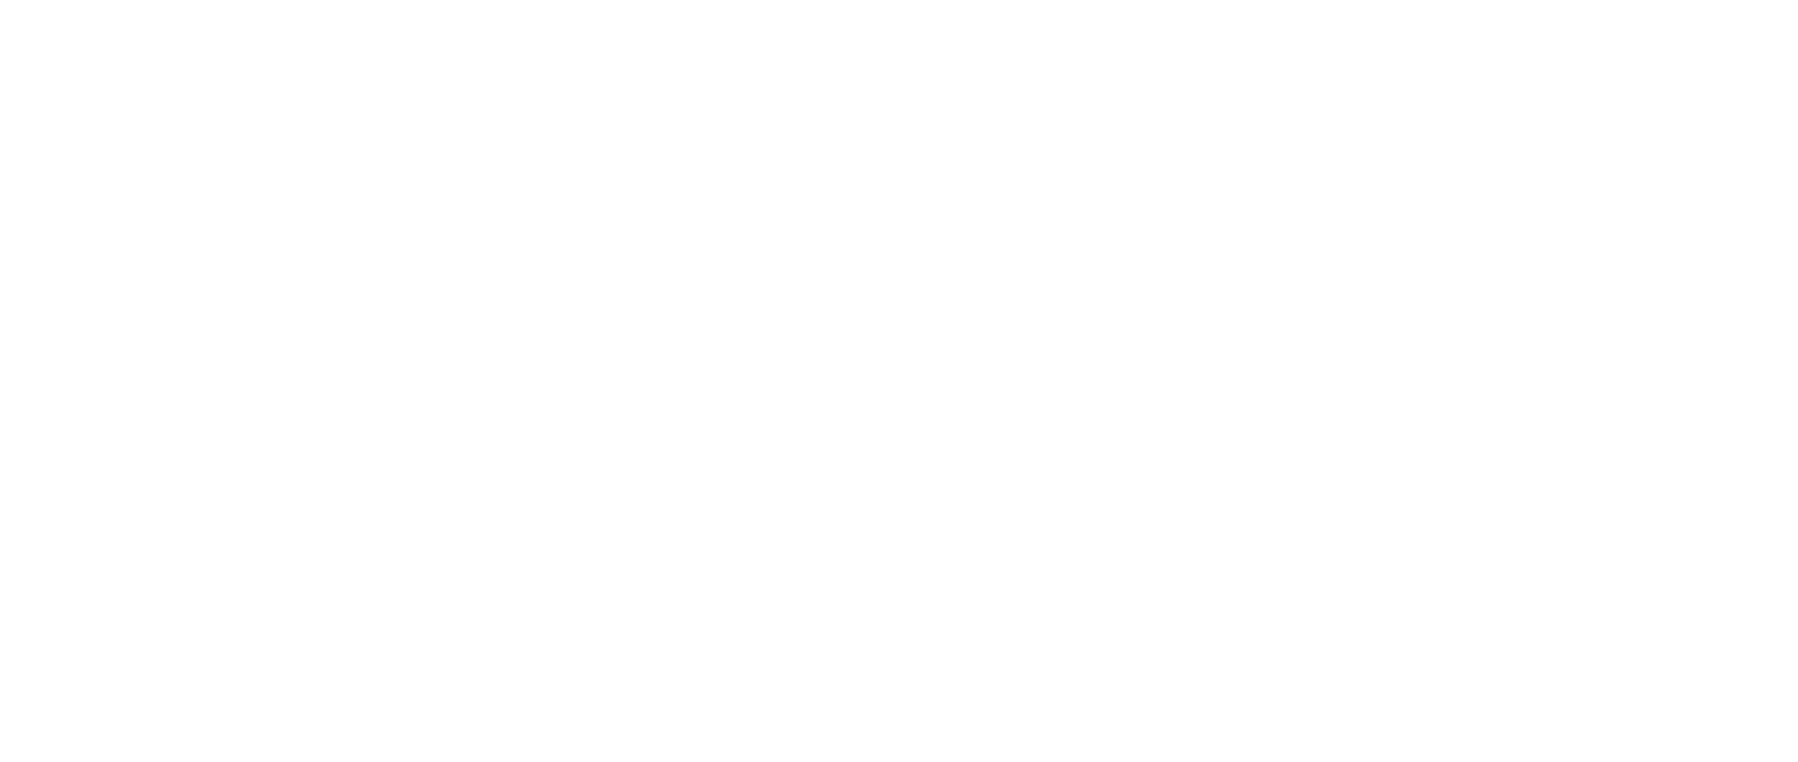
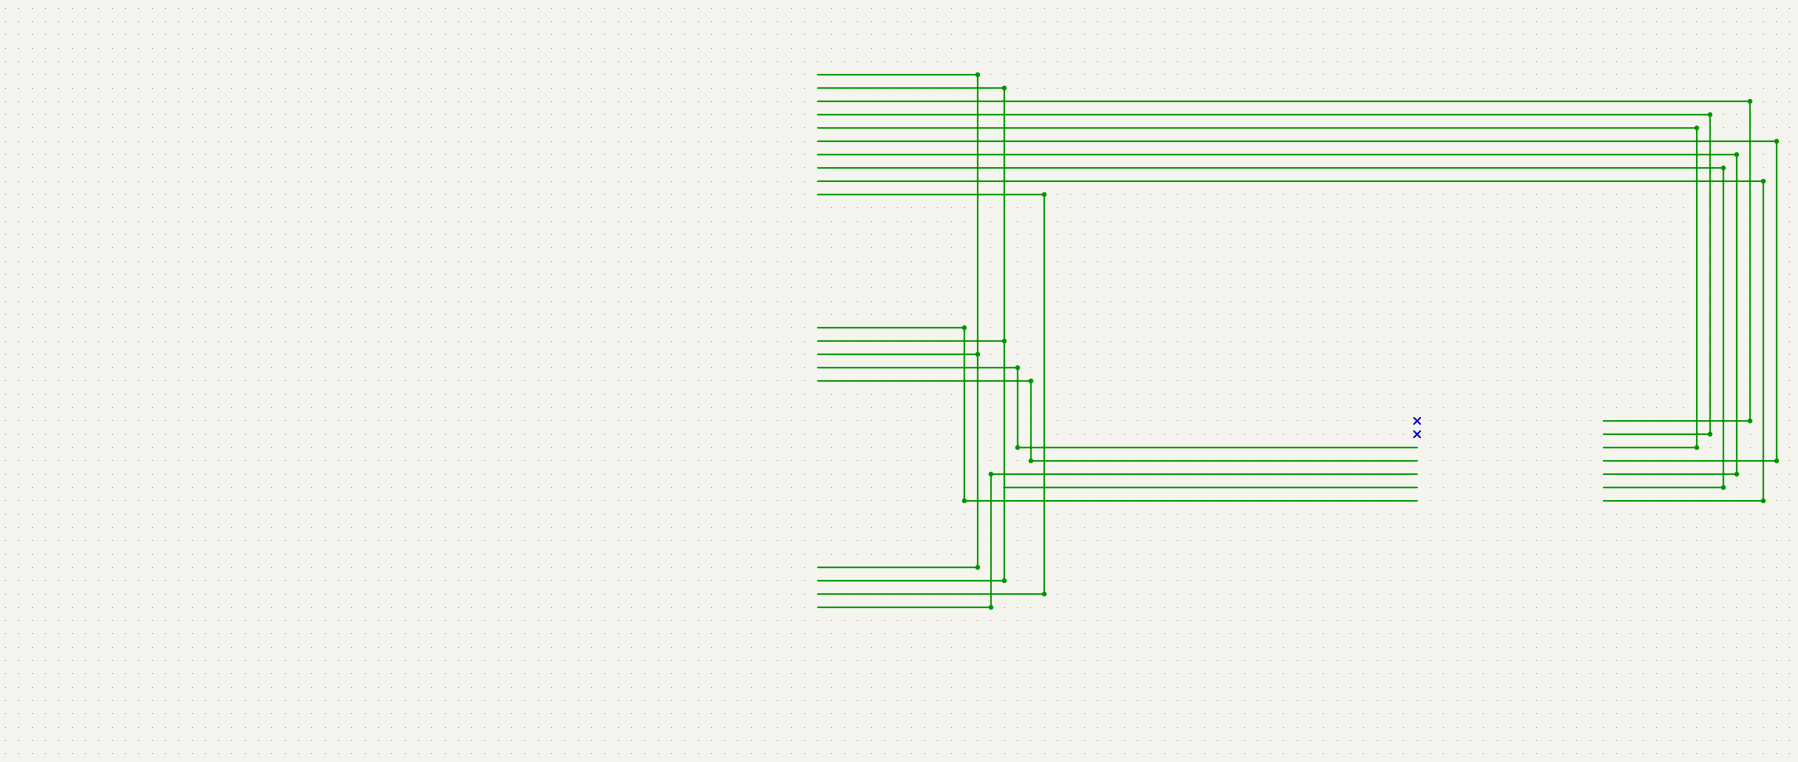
wire: none -> (817, 74) (977, 74) (977, 567) (817, 567)
junction: none -> (977, 74)
wire: none -> (817, 88) (1004, 88) (1004, 580) (817, 580)
junction: none -> (1004, 88)
wire: none -> (817, 101) (1750, 101) (1750, 420) (1603, 420)
junction: none -> (1750, 101)
wire: none -> (817, 114) (1710, 114) (1710, 434) (1603, 434)
junction: none -> (1710, 114)
wire: none -> (817, 127) (1696, 127) (1696, 447) (1603, 447)
junction: none -> (1696, 127)
wire: none -> (817, 141) (1776, 141) (1776, 460) (1603, 460)
junction: none -> (1776, 141)
wire: none -> (817, 154) (1736, 154) (1736, 474) (1603, 474)
junction: none -> (1736, 154)
wire: none -> (817, 167) (1723, 167) (1723, 487) (1603, 487)
junction: none -> (1723, 167)
wire: none -> (817, 181) (1763, 181) (1763, 500) (1603, 500)
junction: none -> (1763, 181)
wire: none -> (817, 194) (1044, 194) (1044, 594) (817, 594)
junction: none -> (1044, 194)
wire: none -> (817, 327) (964, 327) (964, 500) (1417, 500)
junction: none -> (964, 327)
wire: none -> (817, 341) (1004, 341)
junction: none -> (1004, 341)
wire: none -> (817, 354) (977, 354)
junction: none -> (977, 354)
wire: none -> (817, 367) (1017, 367) (1017, 447) (1417, 447)
junction: none -> (1017, 367)
wire: none -> (817, 380) (1030, 380) (1030, 460) (1417, 460)
junction: none -> (1030, 380)
no-connect mark: none -> (1417, 420)
junction: none -> (1750, 420)
no-connect mark: none -> (1417, 434)
junction: none -> (1710, 434)
junction: none -> (1017, 447)
junction: none -> (1696, 447)
junction: none -> (1030, 460)
junction: none -> (1776, 460)
junction: none -> (990, 474)
wire: none -> (1417, 474) (990, 474) (990, 607) (817, 607)
junction: none -> (1736, 474)
wire: none -> (1004, 487) (1417, 487)
junction: none -> (1723, 487)
junction: none -> (964, 500)
junction: none -> (1763, 500)
junction: none -> (977, 567)
junction: none -> (1004, 580)
junction: none -> (1044, 594)
junction: none -> (990, 607)

